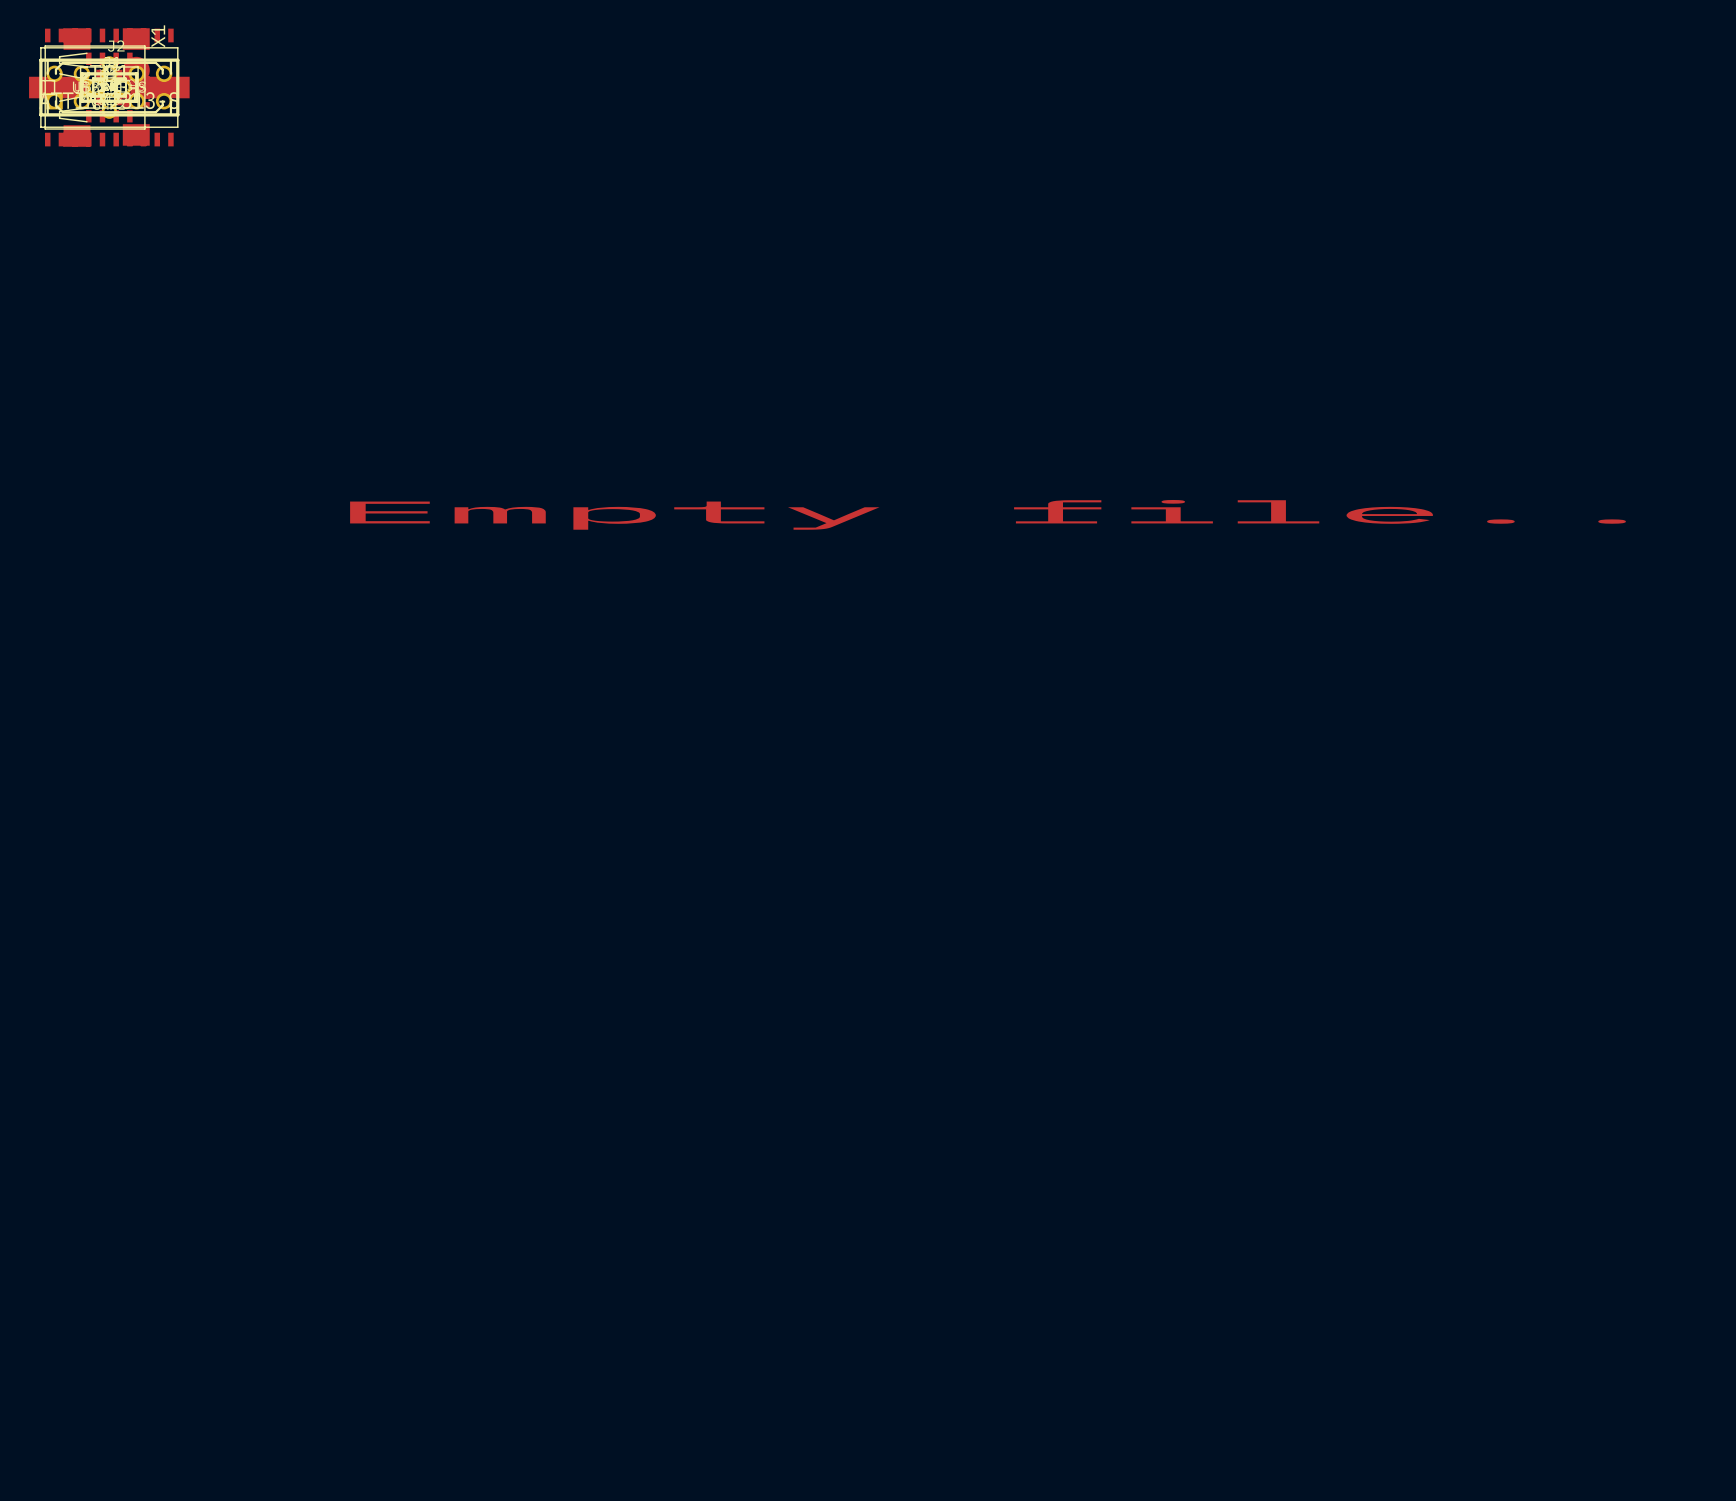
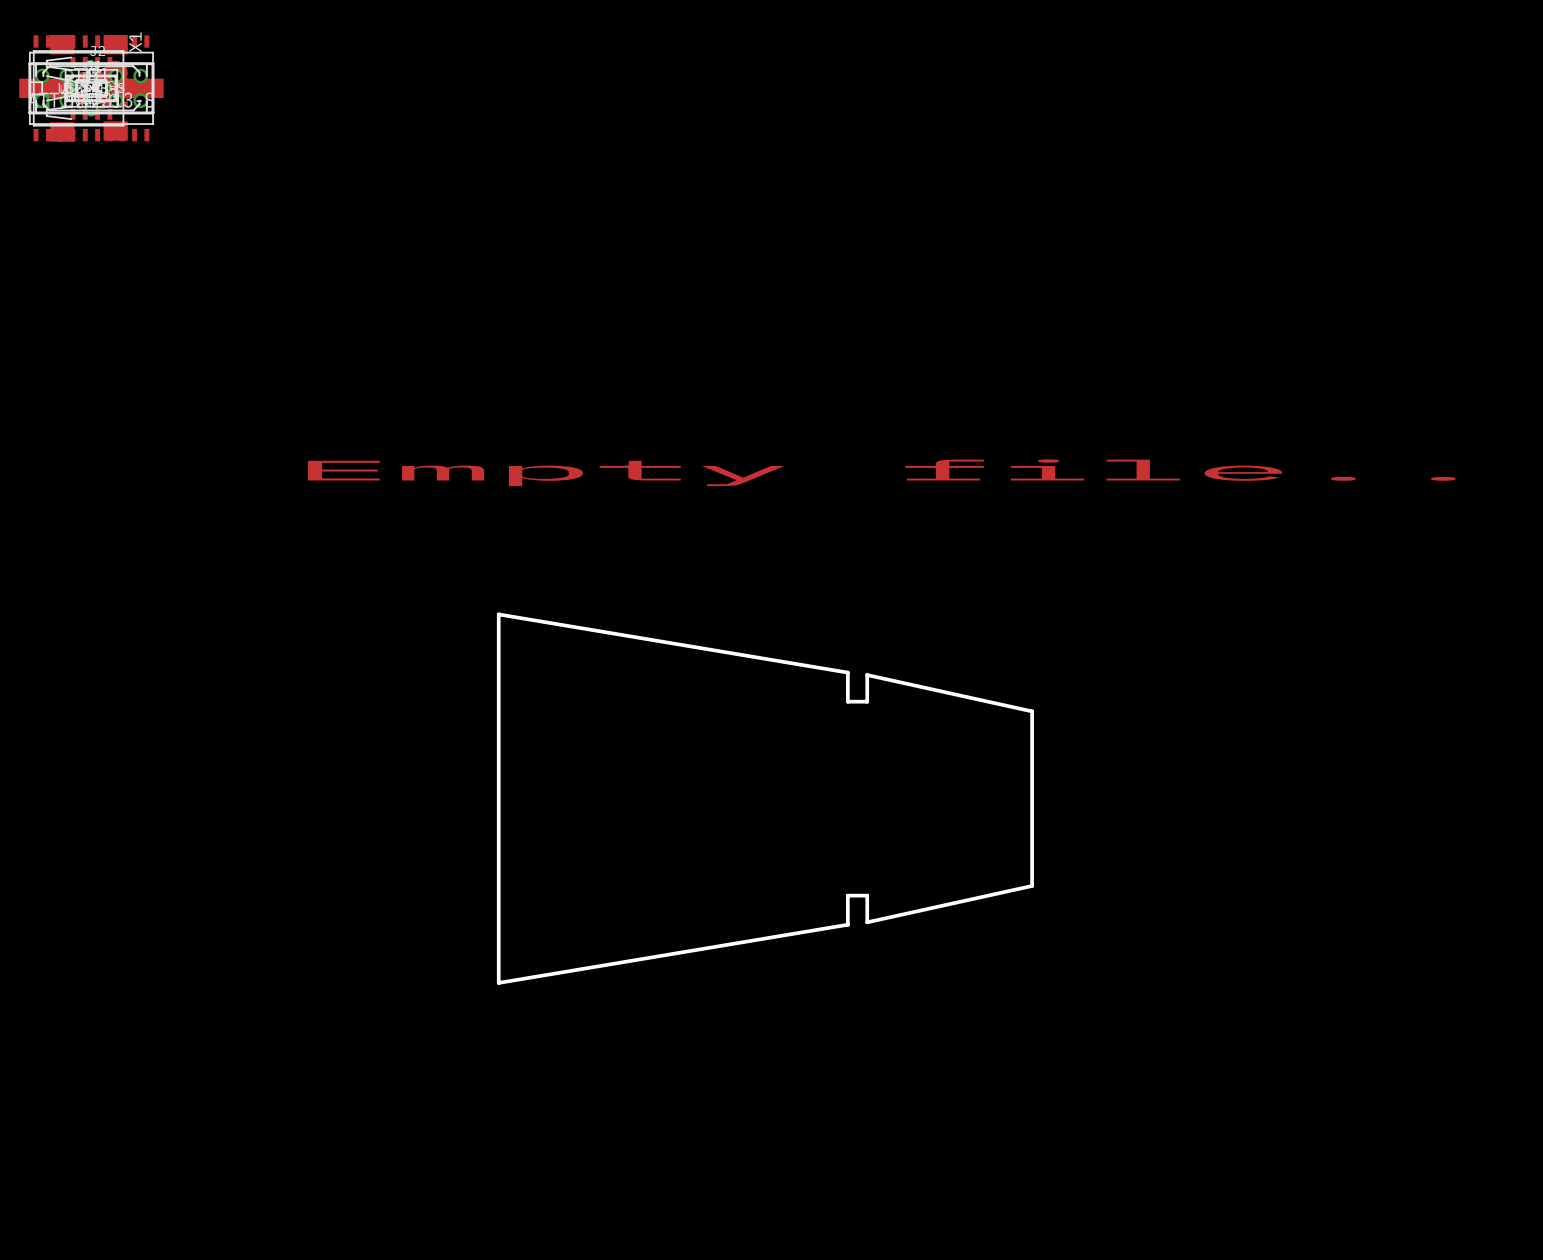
board edge: none -> (498, 614) (847, 672) (847, 701) (867, 701) (867, 675) (1032, 711) (1032, 885) (867, 922) (867, 895) (847, 895) (847, 924) (498, 982) (498, 614)

